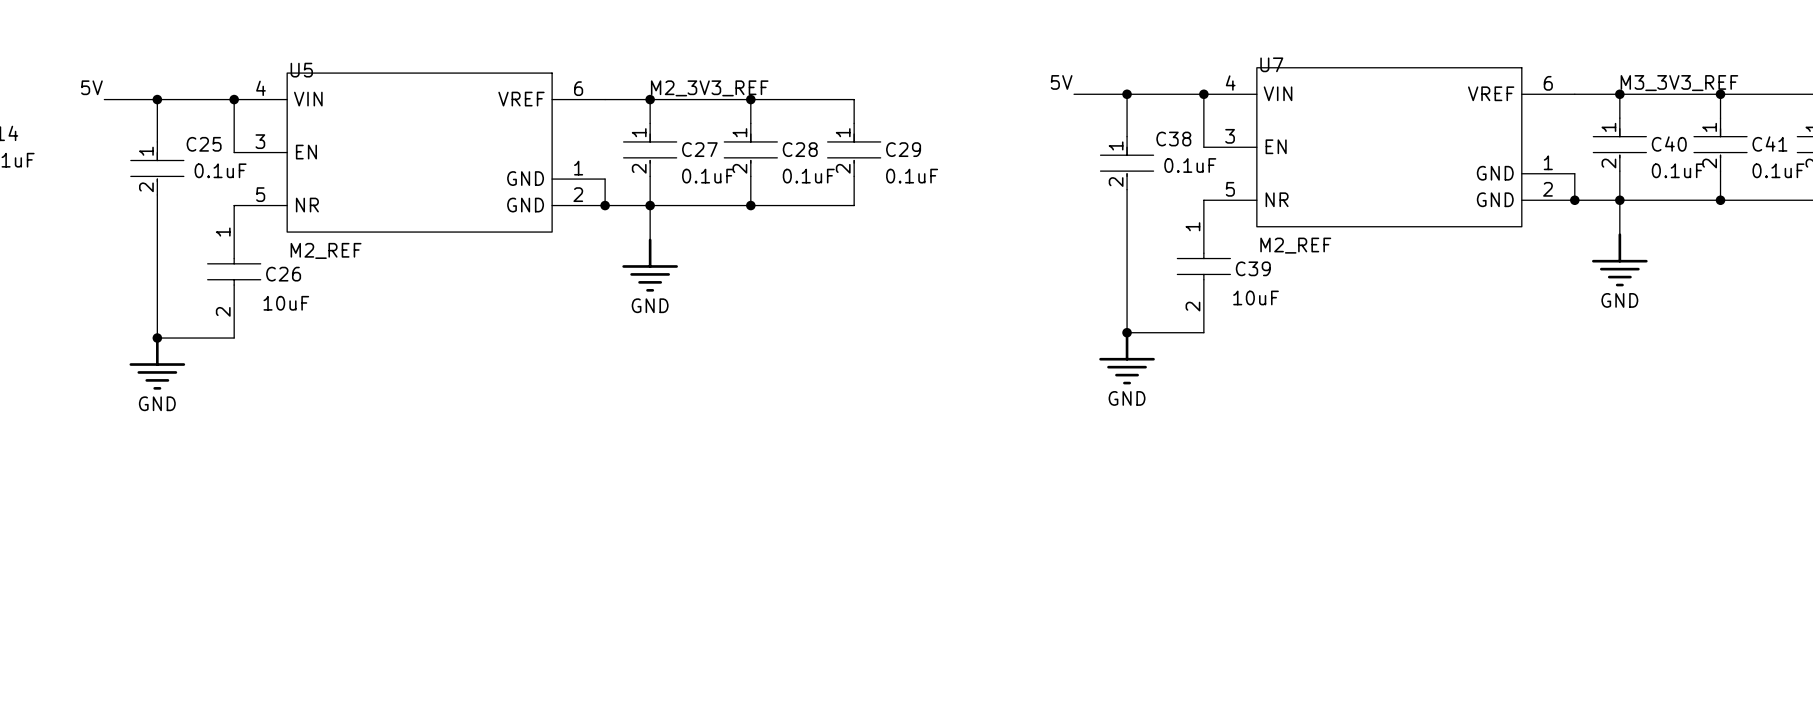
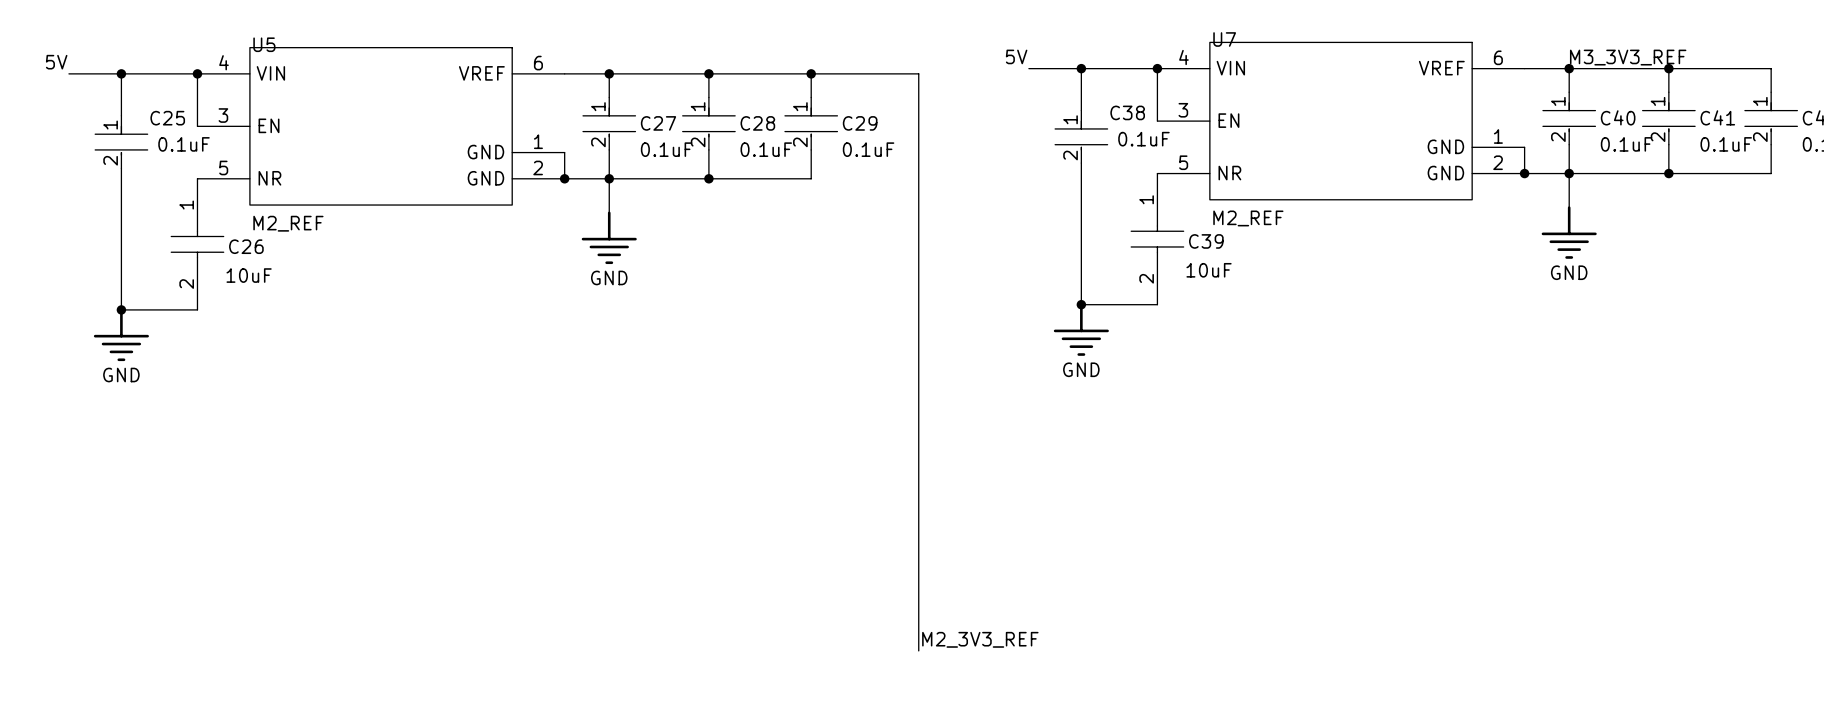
label: M2_3V3_REF (709, 88) -> none
wire: none -> (811, 73) (918, 73) (918, 650)
junction: none -> (811, 73)
label: none -> M2_3V3_REF (980, 639)

